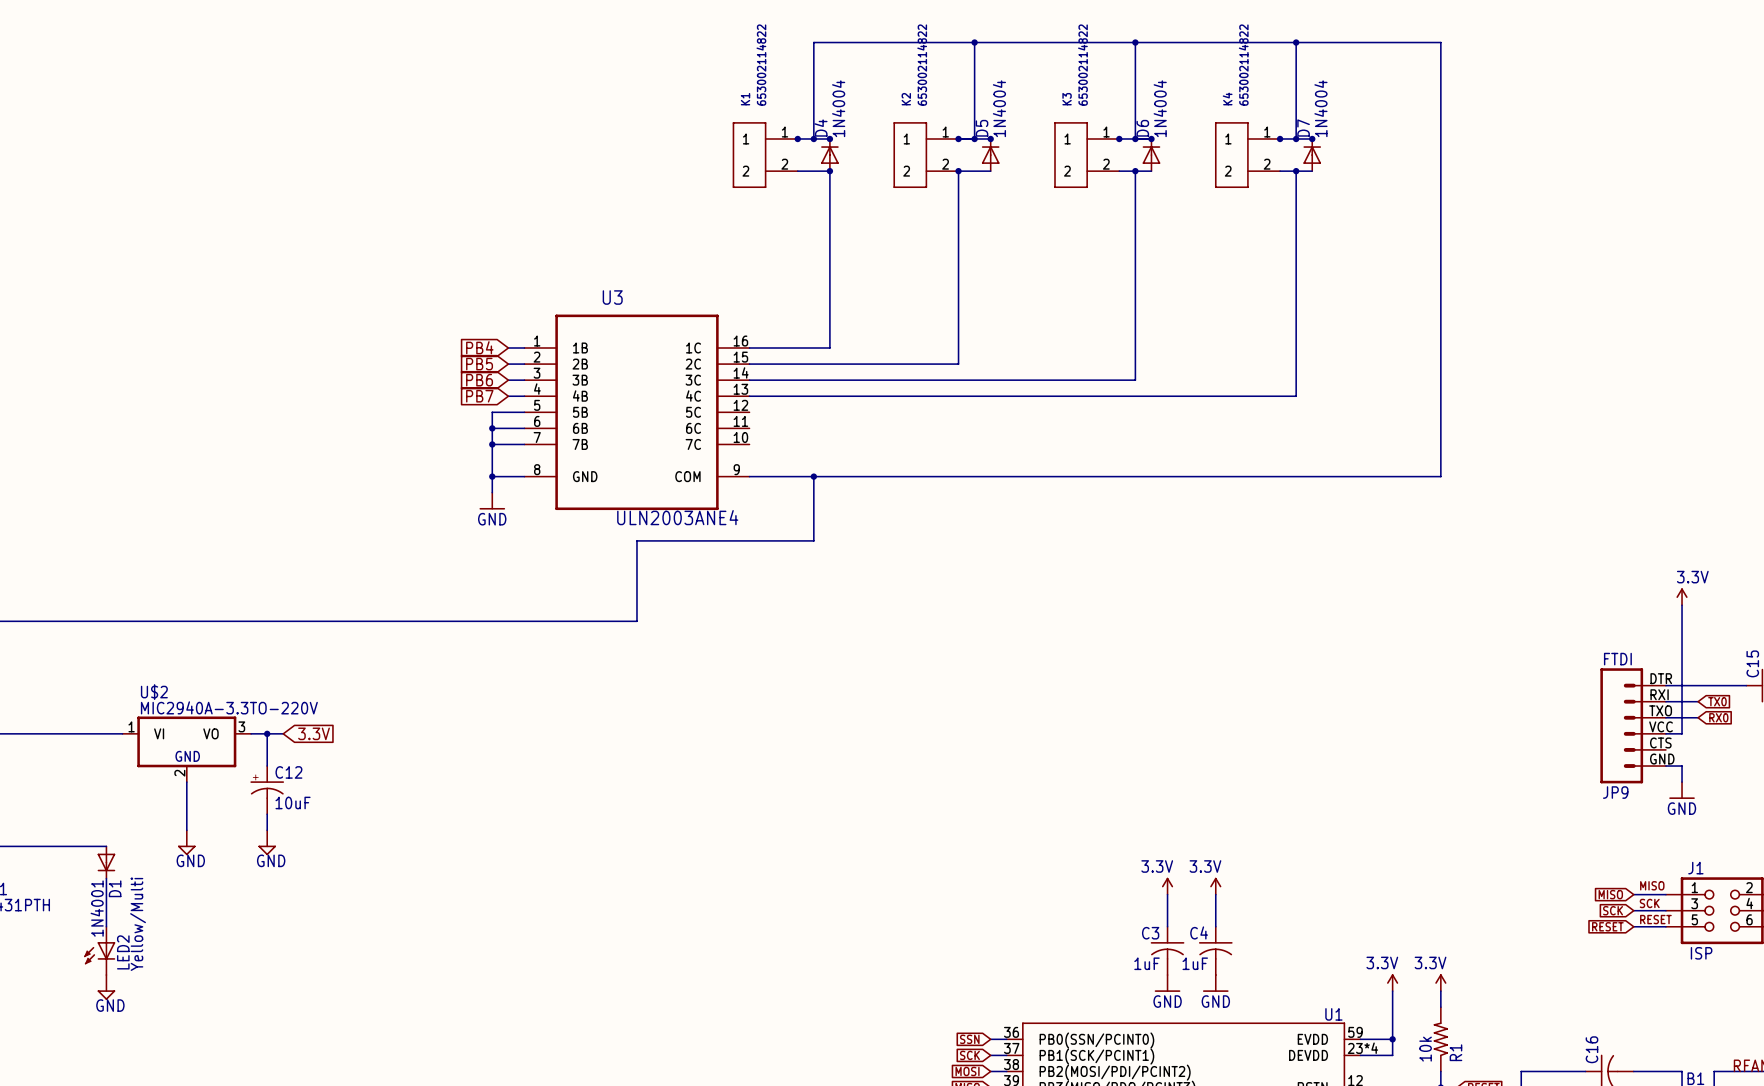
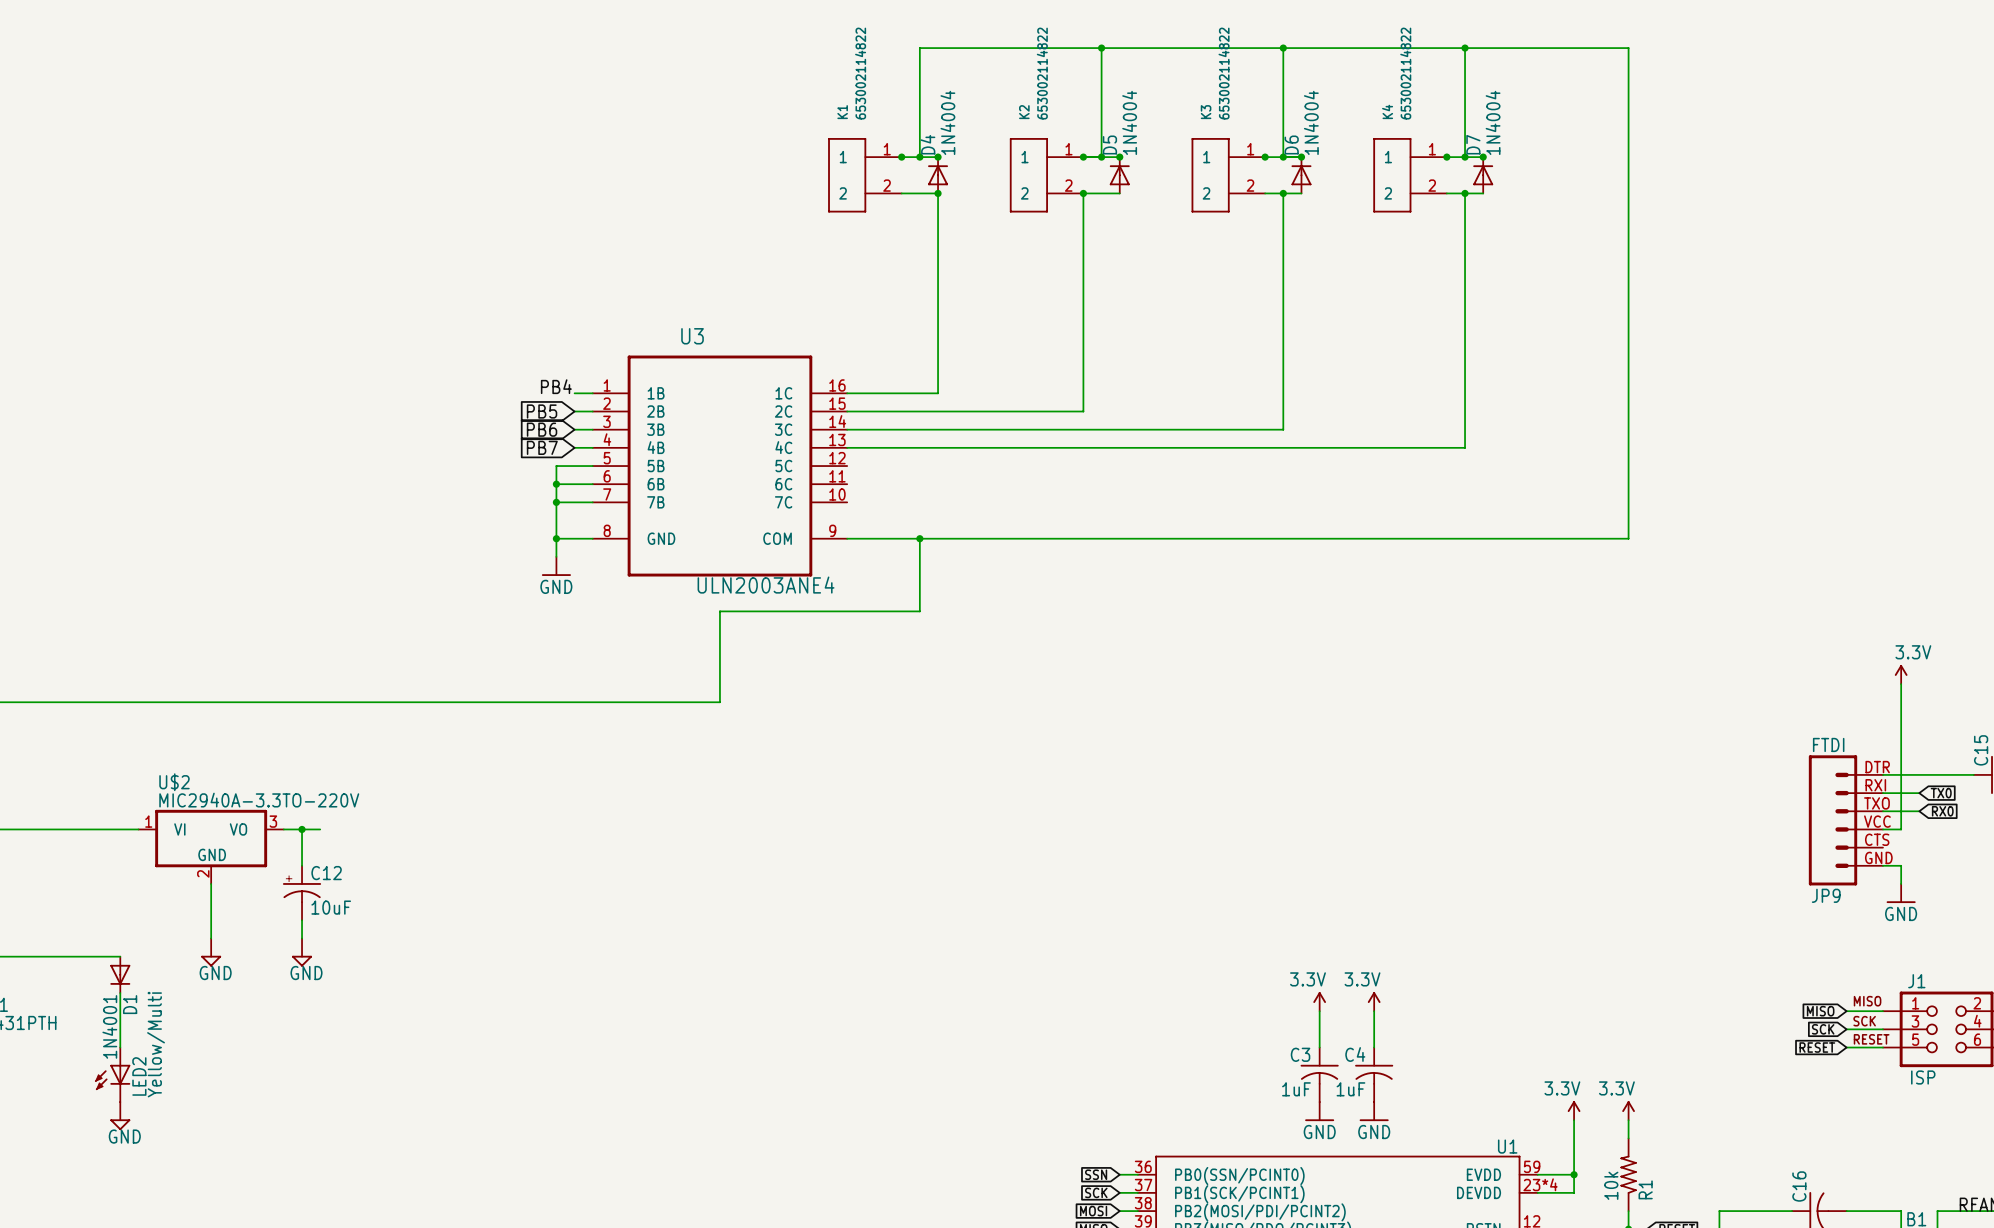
label: none -> PB4 (556, 386)
global label: PB4 (479, 347) -> none
global label: 3.3V (314, 733) -> none

